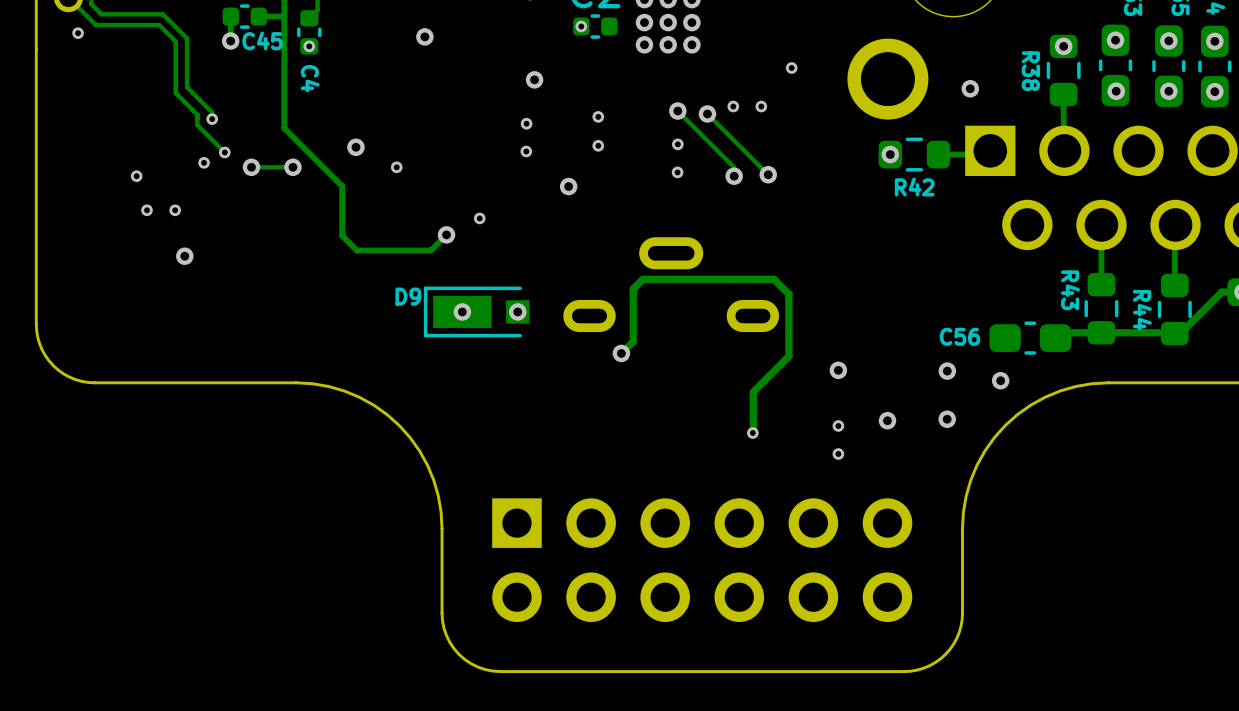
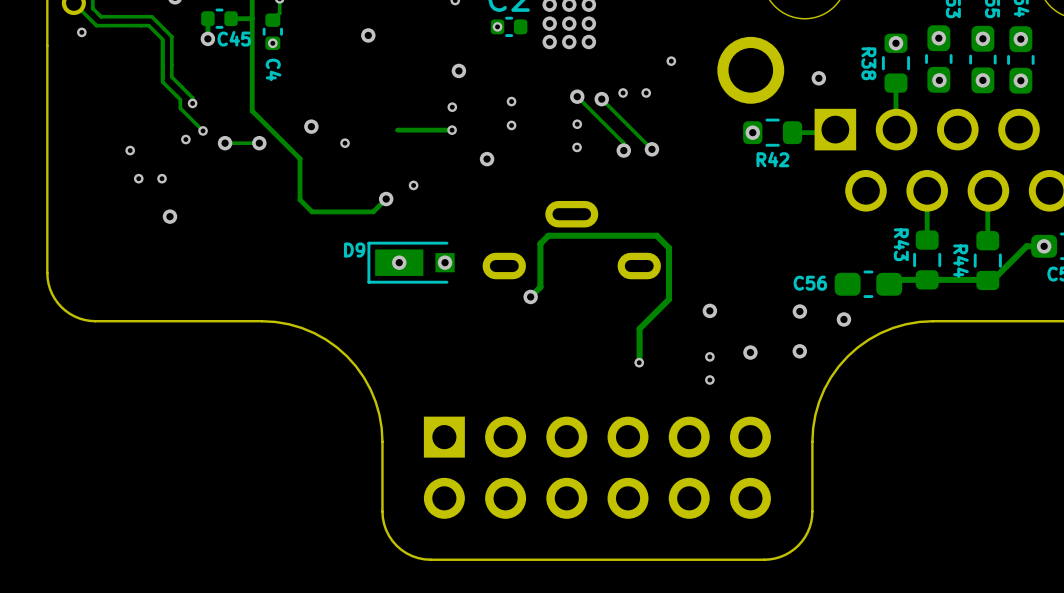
track: none -> (452, 130) (397, 130)

